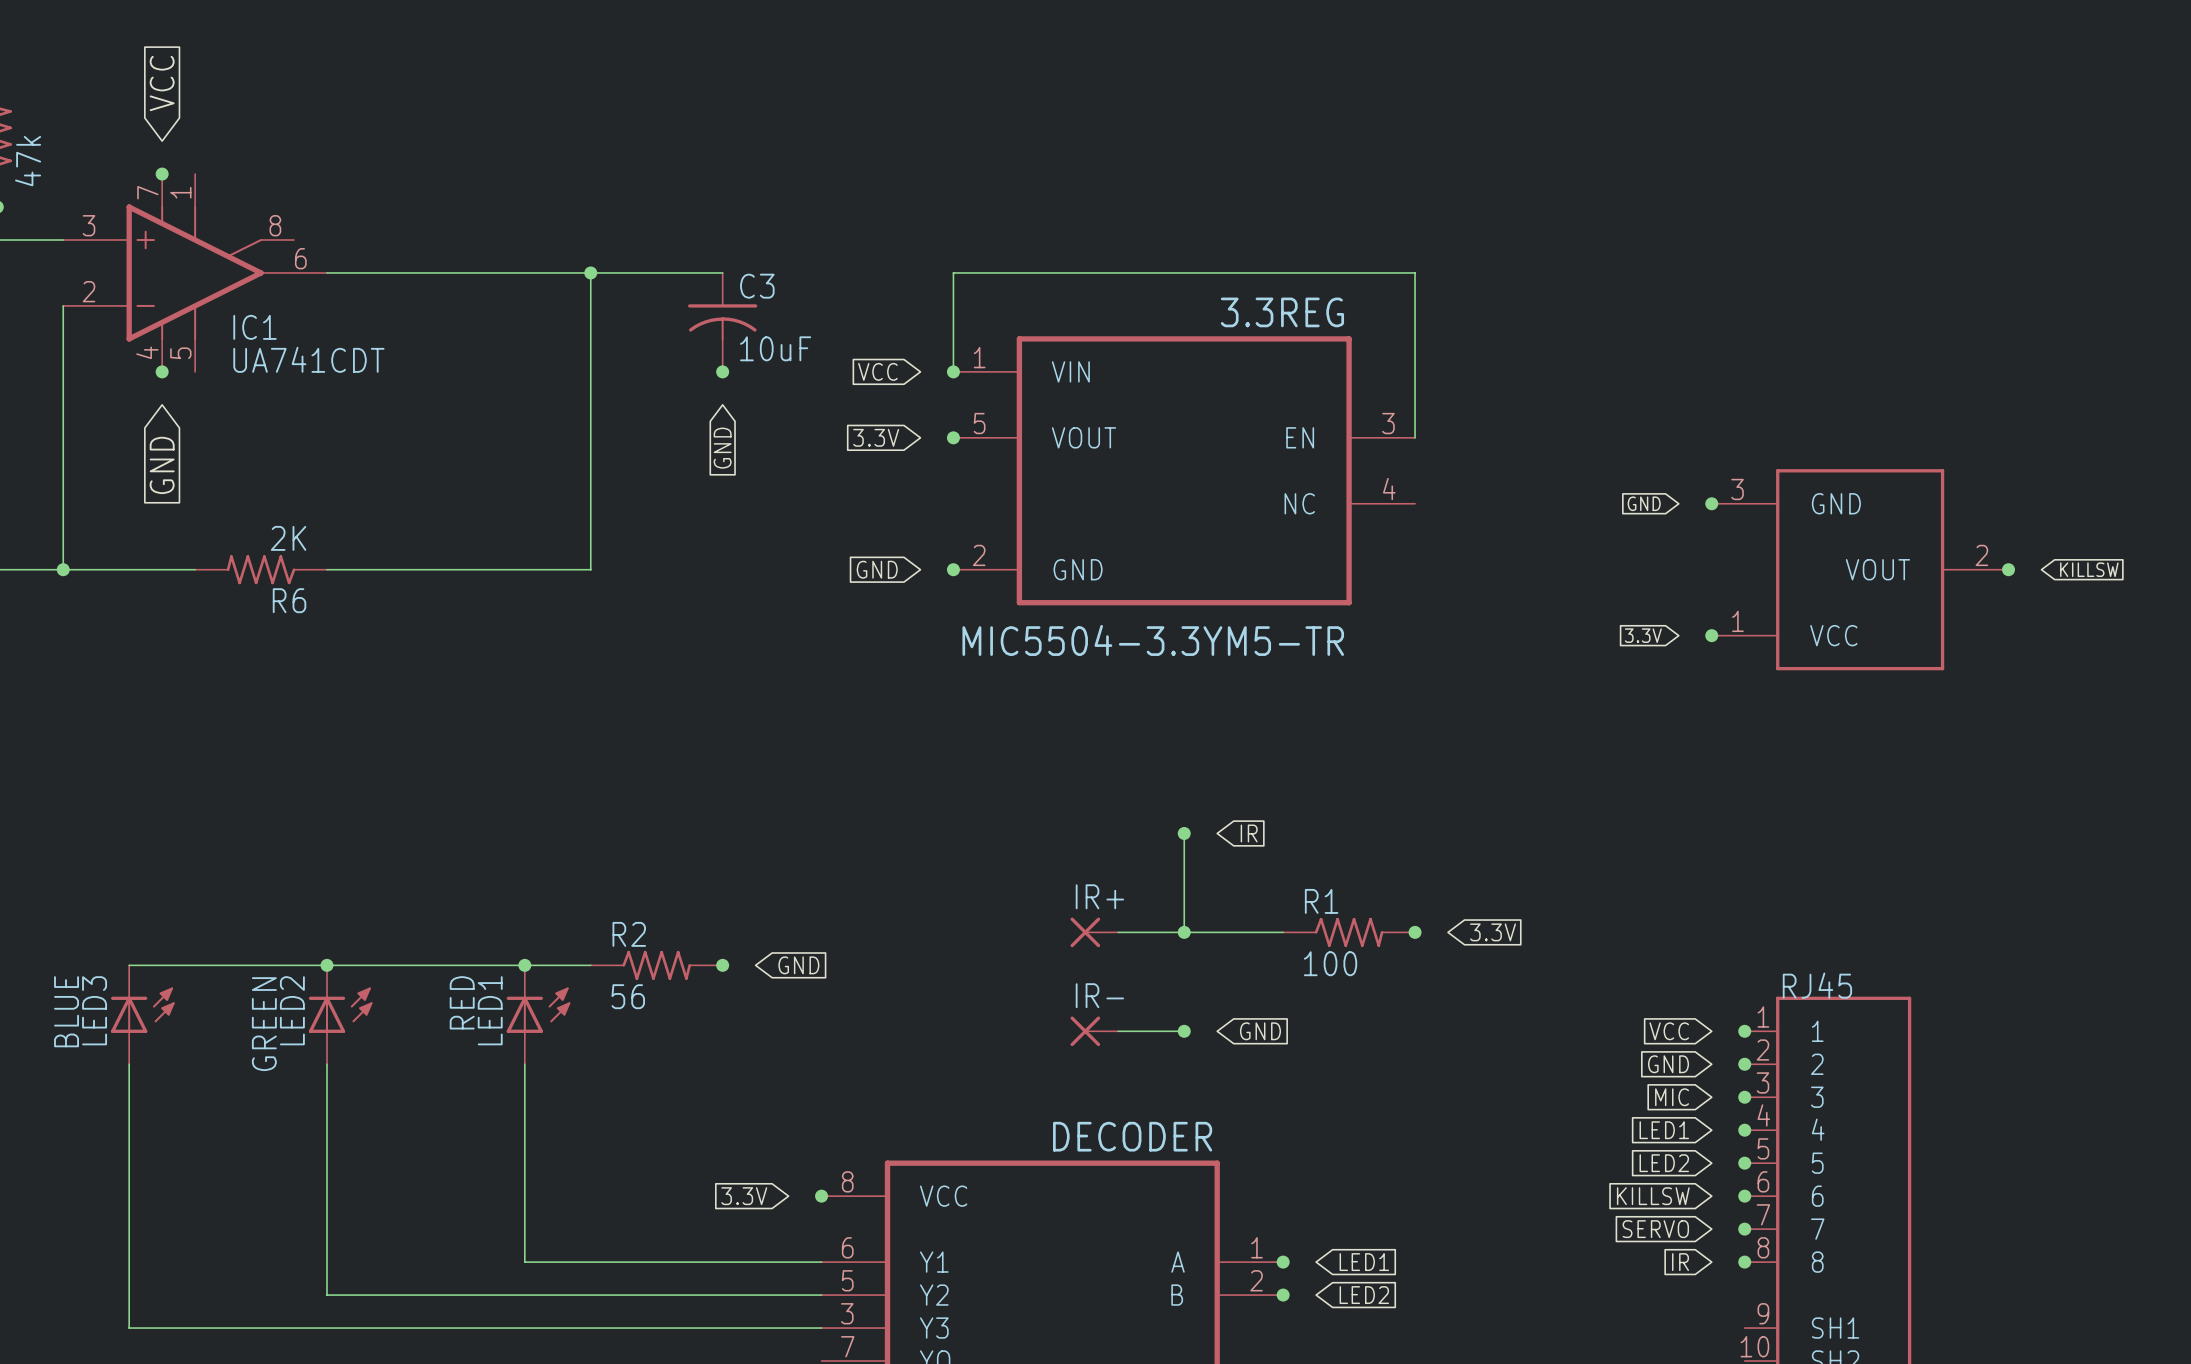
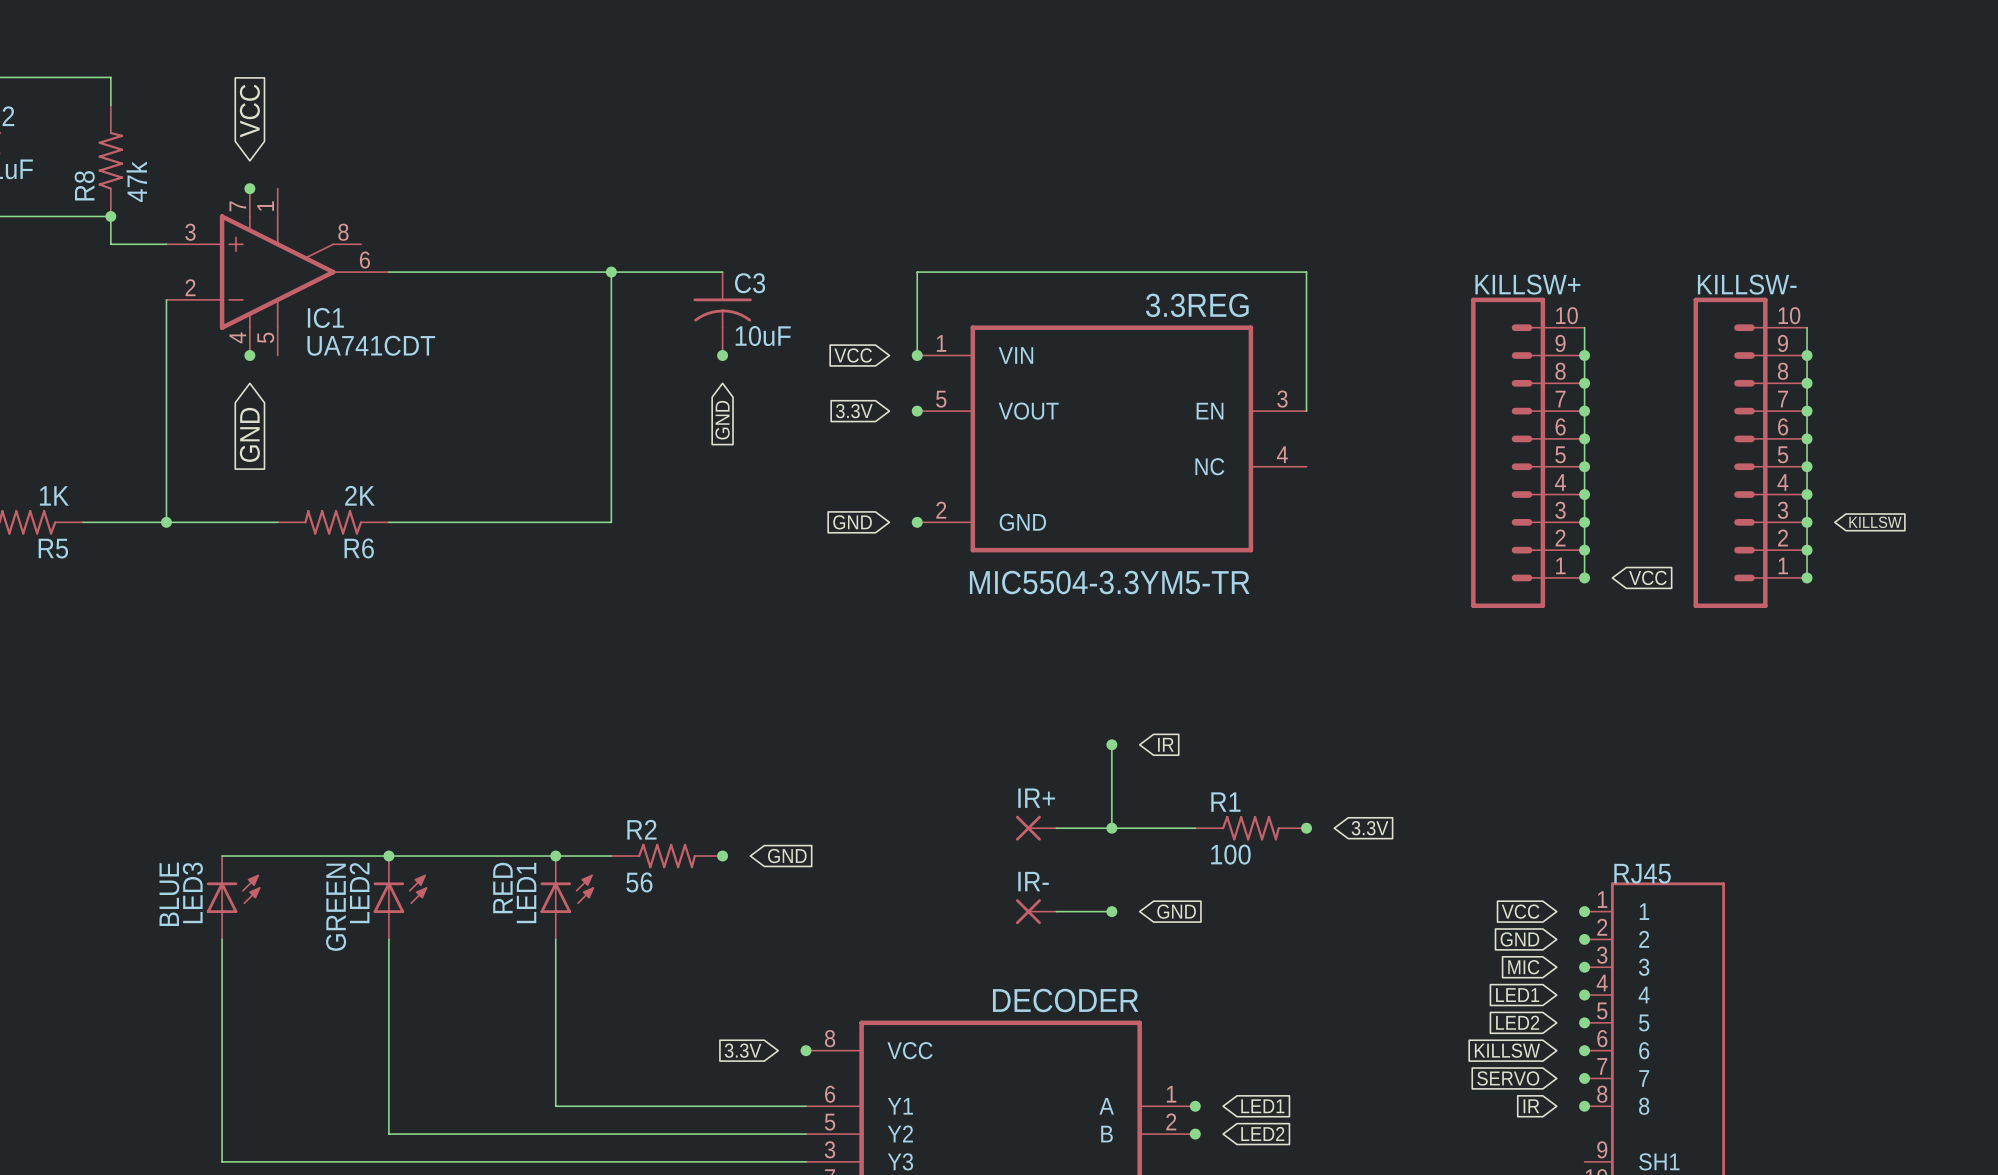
wire: none -> (1584, 327) (1584, 577)
wire: none -> (1807, 327) (1807, 577)
junction: none -> (1584, 355)
junction: none -> (1807, 355)
junction: none -> (1584, 383)
junction: none -> (1807, 383)
junction: none -> (1584, 411)
junction: none -> (1807, 411)
junction: none -> (1584, 438)
junction: none -> (1807, 438)
KILLSW+: none -> (1527, 452)
KILLSW-: none -> (1750, 452)
global label: GND (1644, 503) -> none
junction: (1711, 503) -> none
junction: none -> (1584, 466)
junction: none -> (1807, 466)
junction: none -> (1584, 494)
junction: none -> (1807, 494)
junction: none -> (1584, 522)
part: (1860, 569) -> none
junction: none -> (1584, 550)
junction: none -> (1807, 550)
global label: 3.3V (1643, 635) -> none
junction: (1711, 635) -> none
junction: none -> (1584, 577)
global label: none -> VCC (1647, 577)
junction: none -> (1807, 577)

